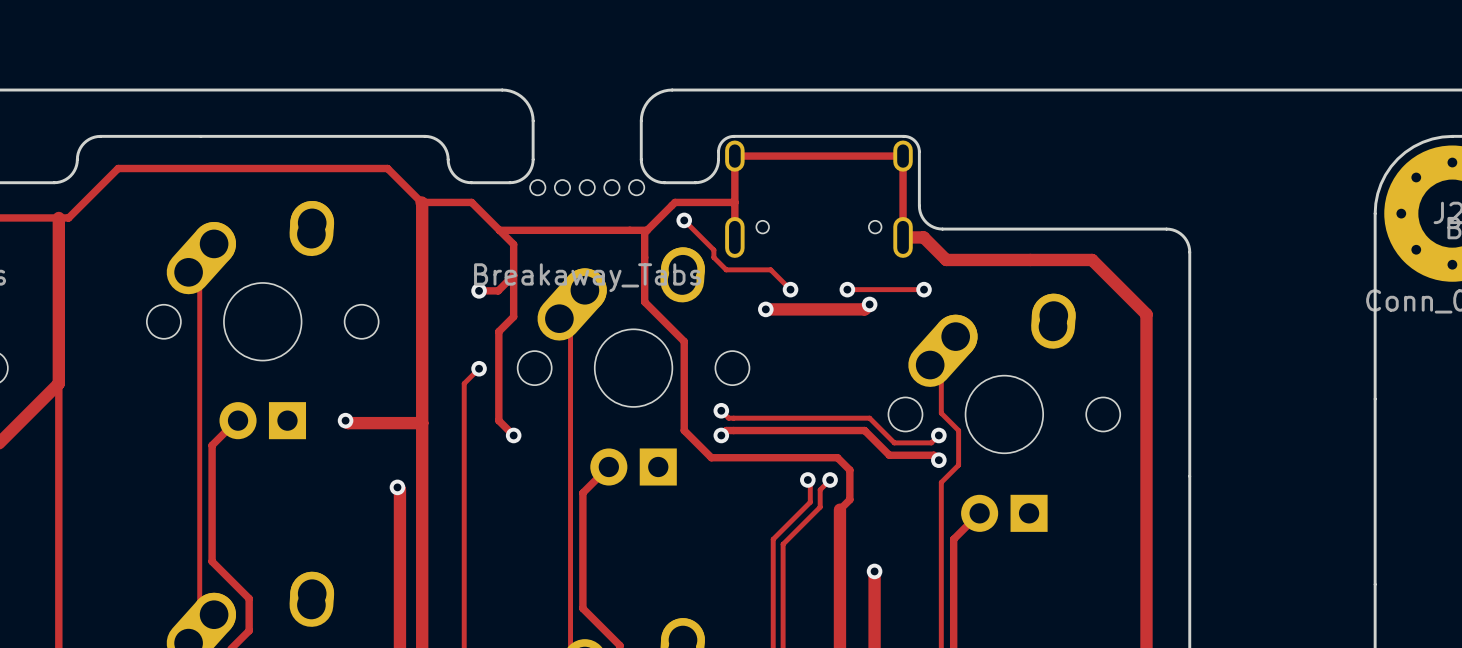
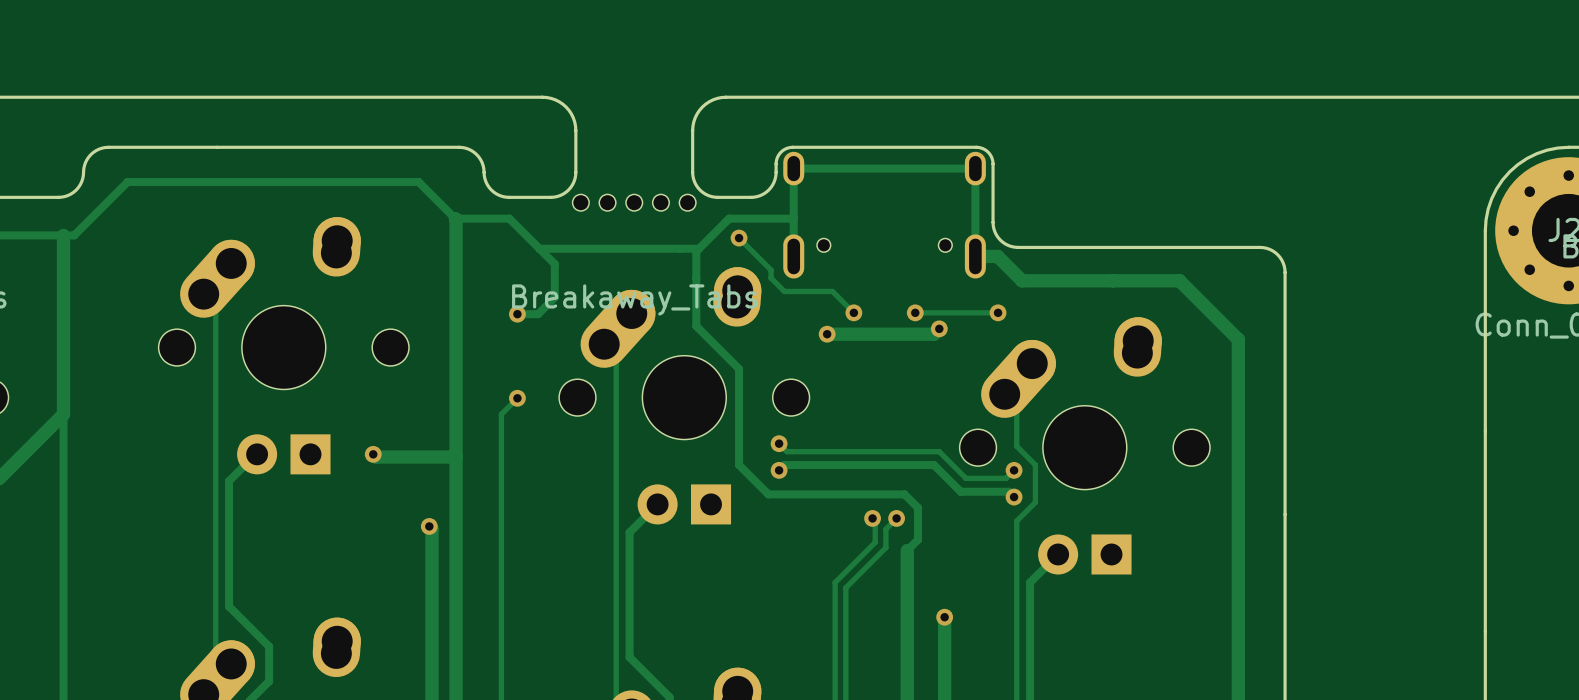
track: (513, 275) (513, 316) (498, 331) (498, 420) (513, 435) -> none
via: (513, 435) -> none

